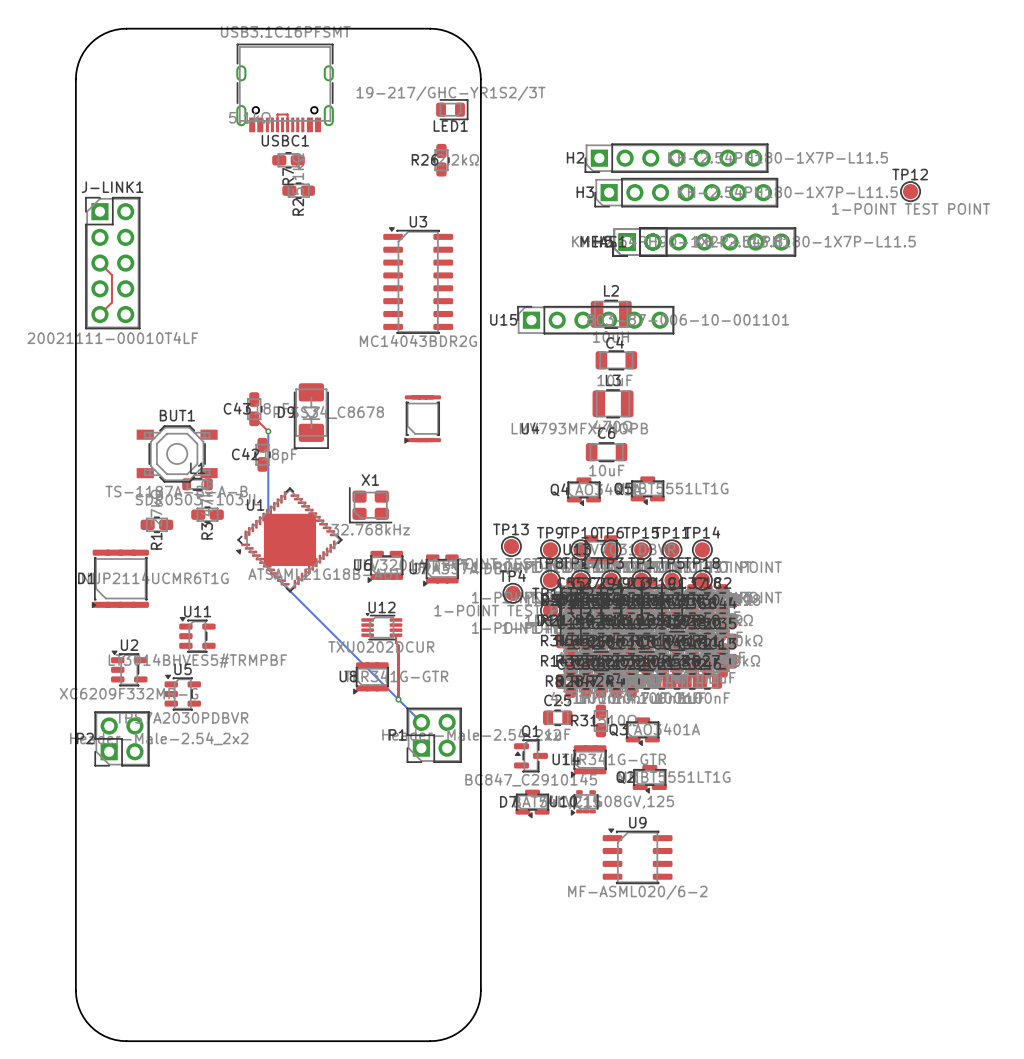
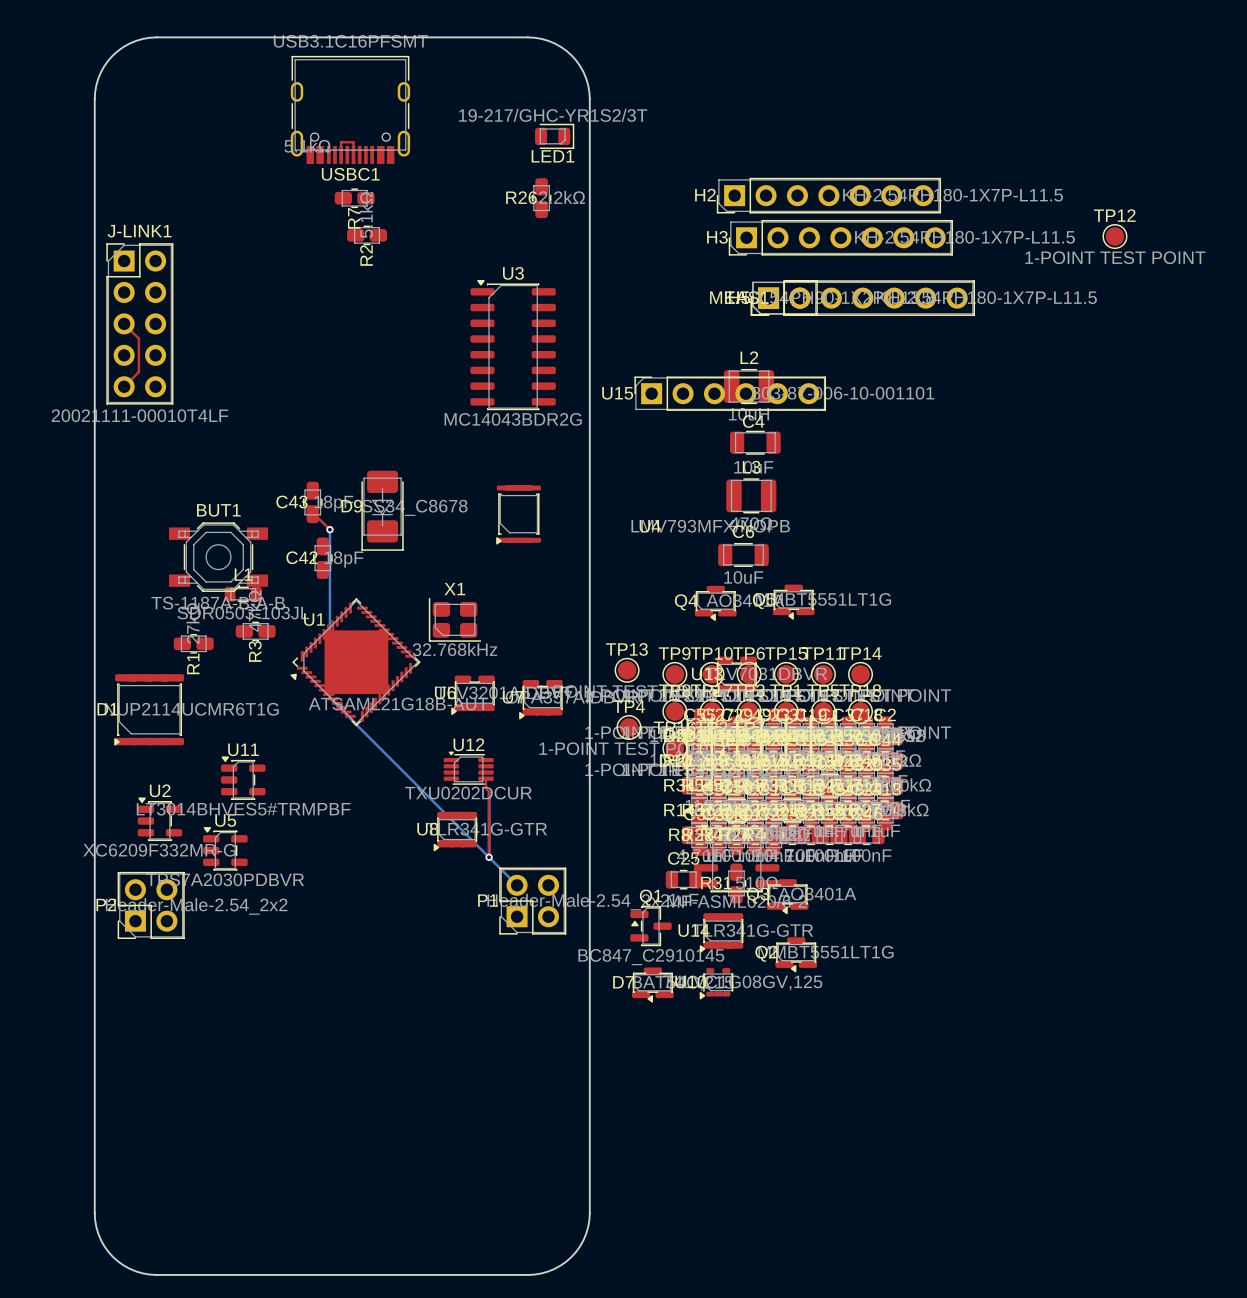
U9 position: (637, 856) -> (736, 858)

